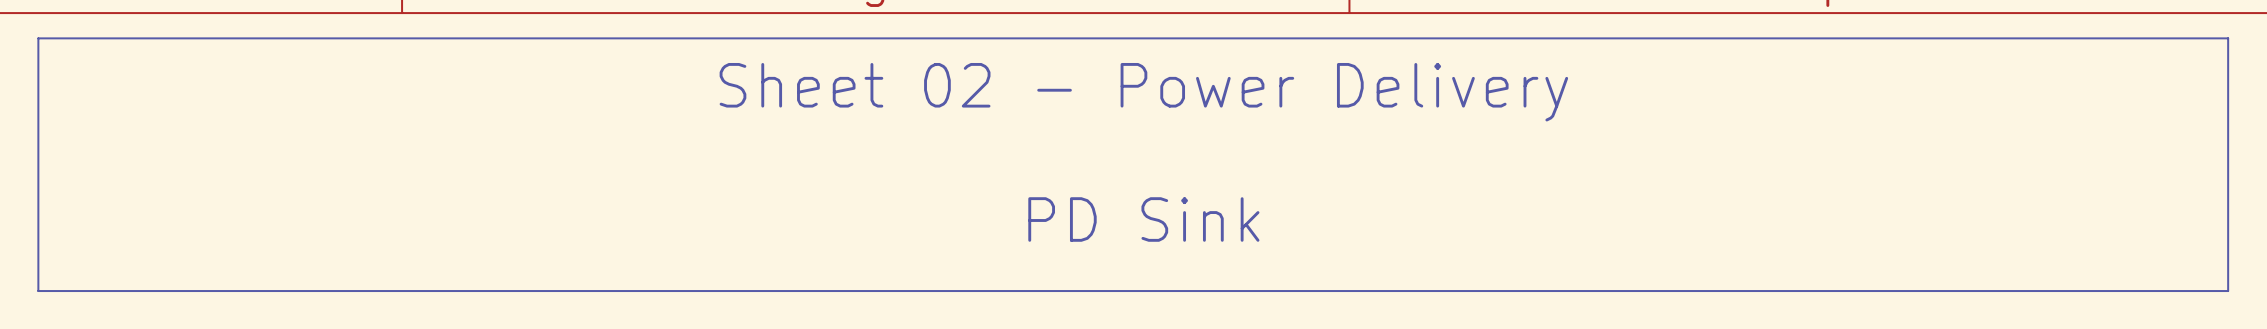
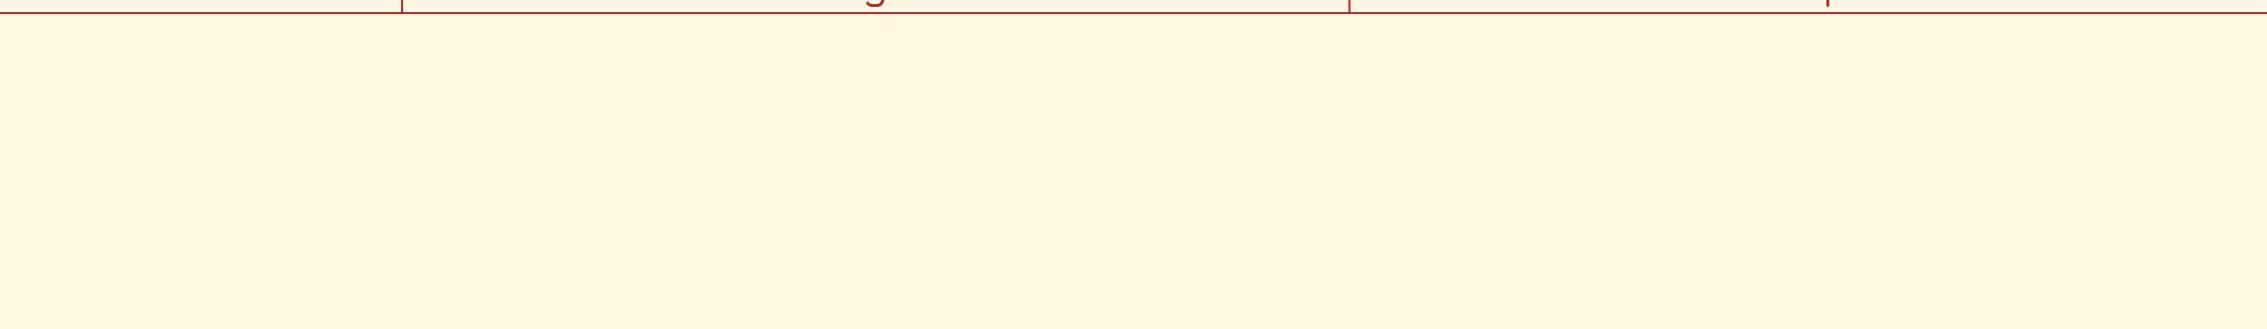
line: (38, 38) (2228, 38) (2228, 291) (38, 291) (38, 38) -> none
text: Sheet 02 - Power Delivery (1143, 92) -> none
text: PD Sink (1143, 219) -> none

